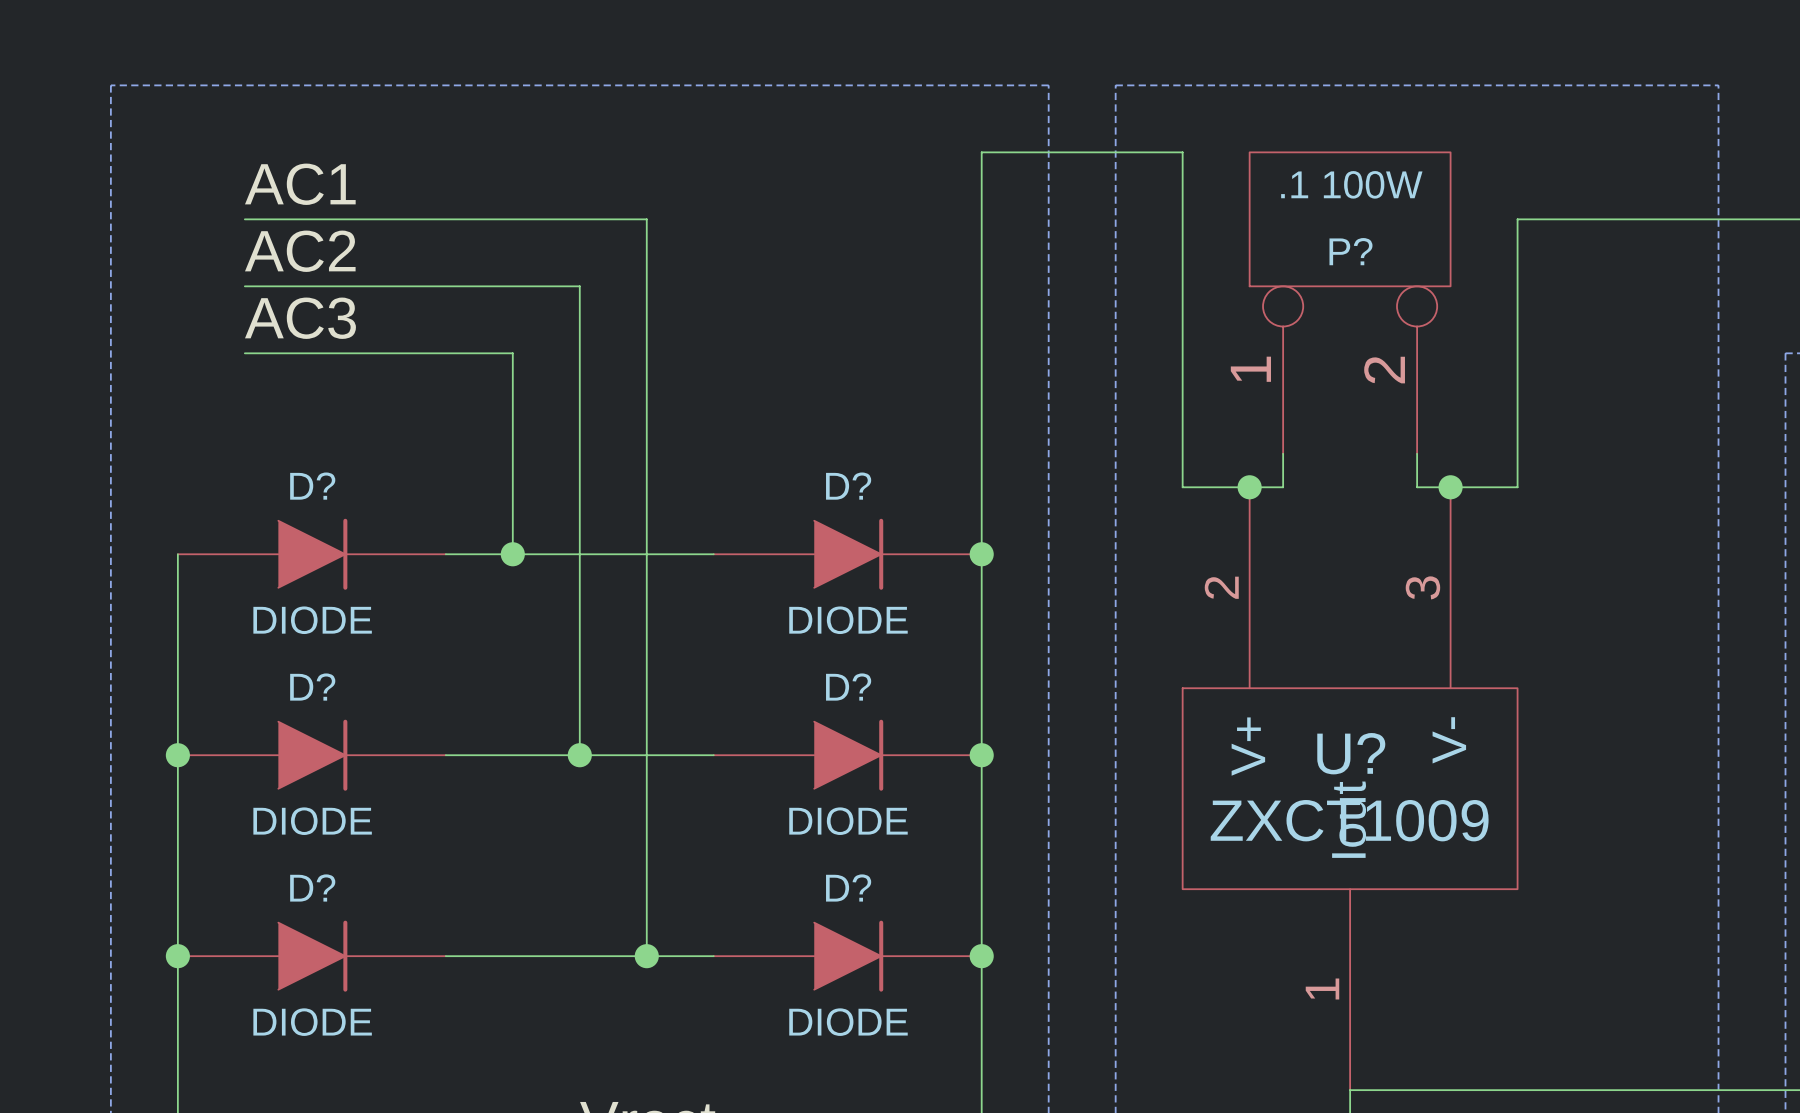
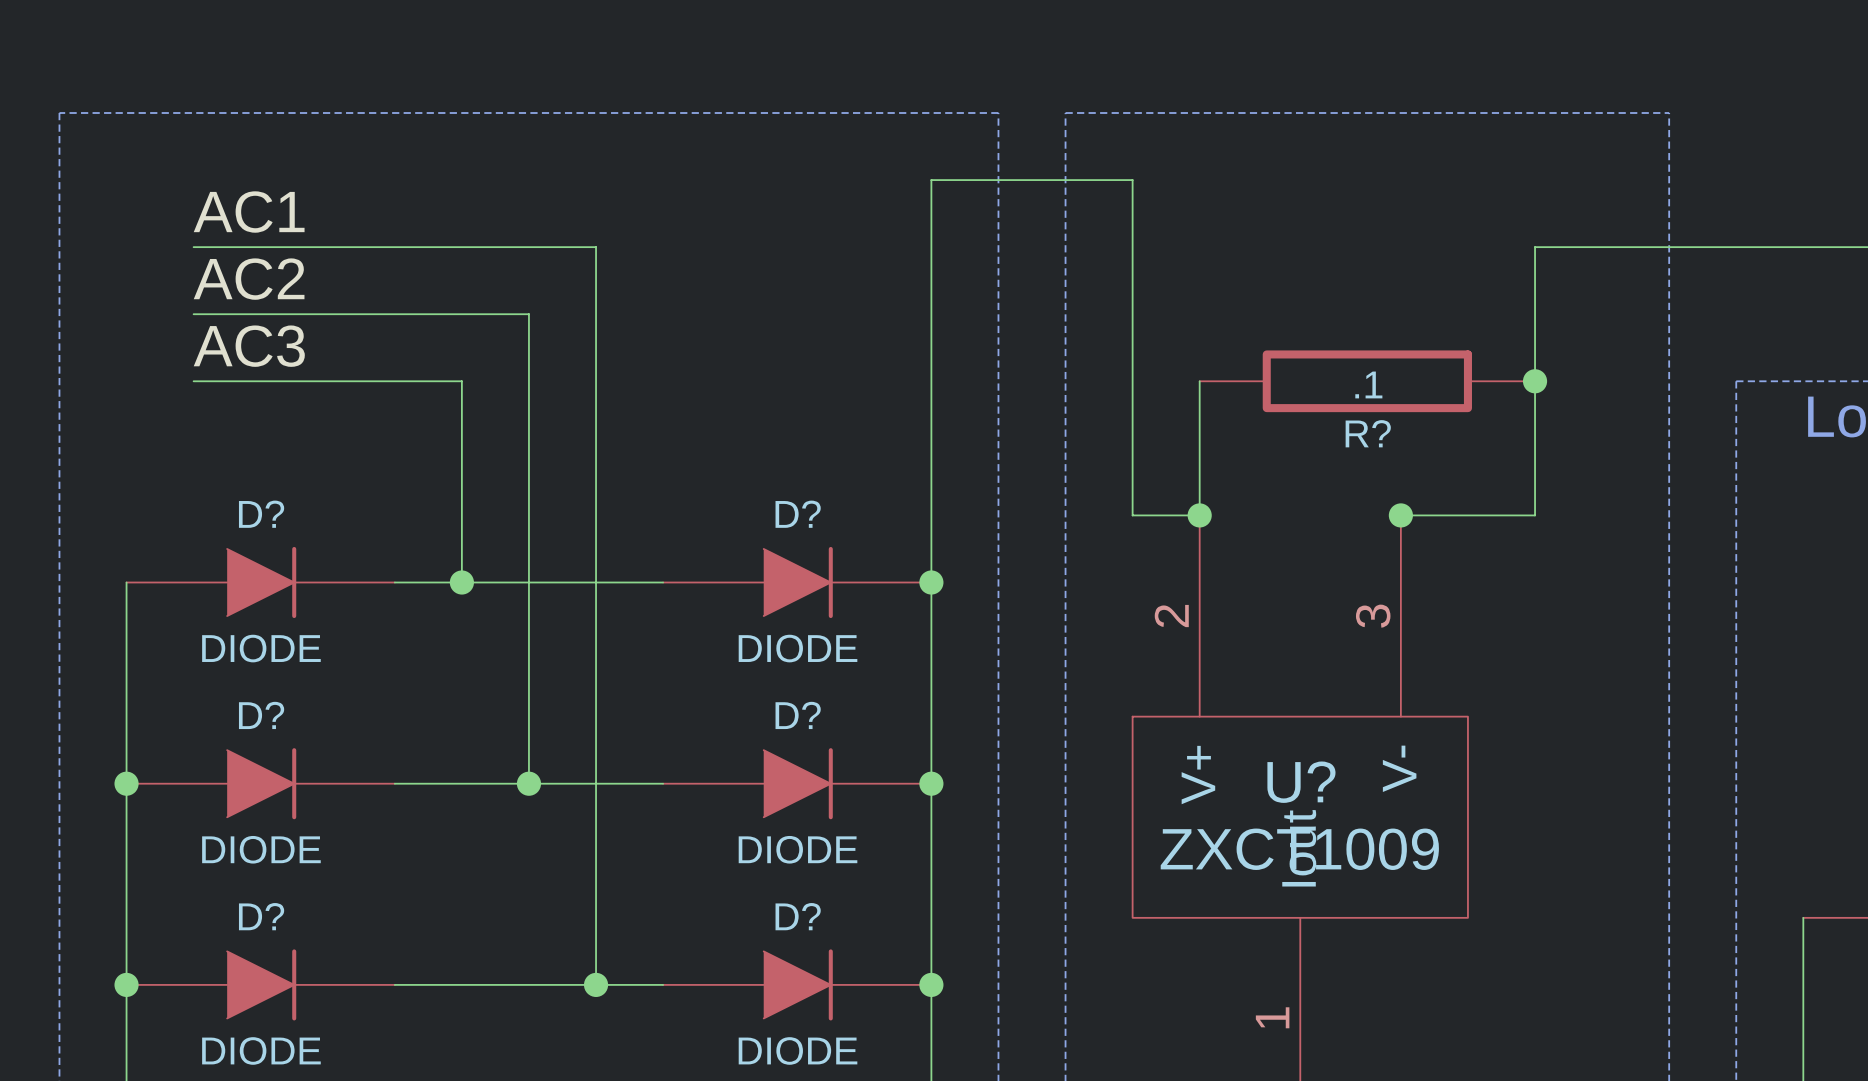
wire: (1584, 219) (1517, 219) (1517, 487) -> (1535, 247) (1535, 515) (1467, 515)
P?: .1 100W (1350, 303) -> none
R?: none -> .1 (1367, 381)
junction: none -> (1535, 381)
wire: (1283, 453) (1283, 487) (1249, 487) -> (1199, 381) (1199, 515)
wire: (1417, 453) (1417, 487) (1450, 487) -> none

